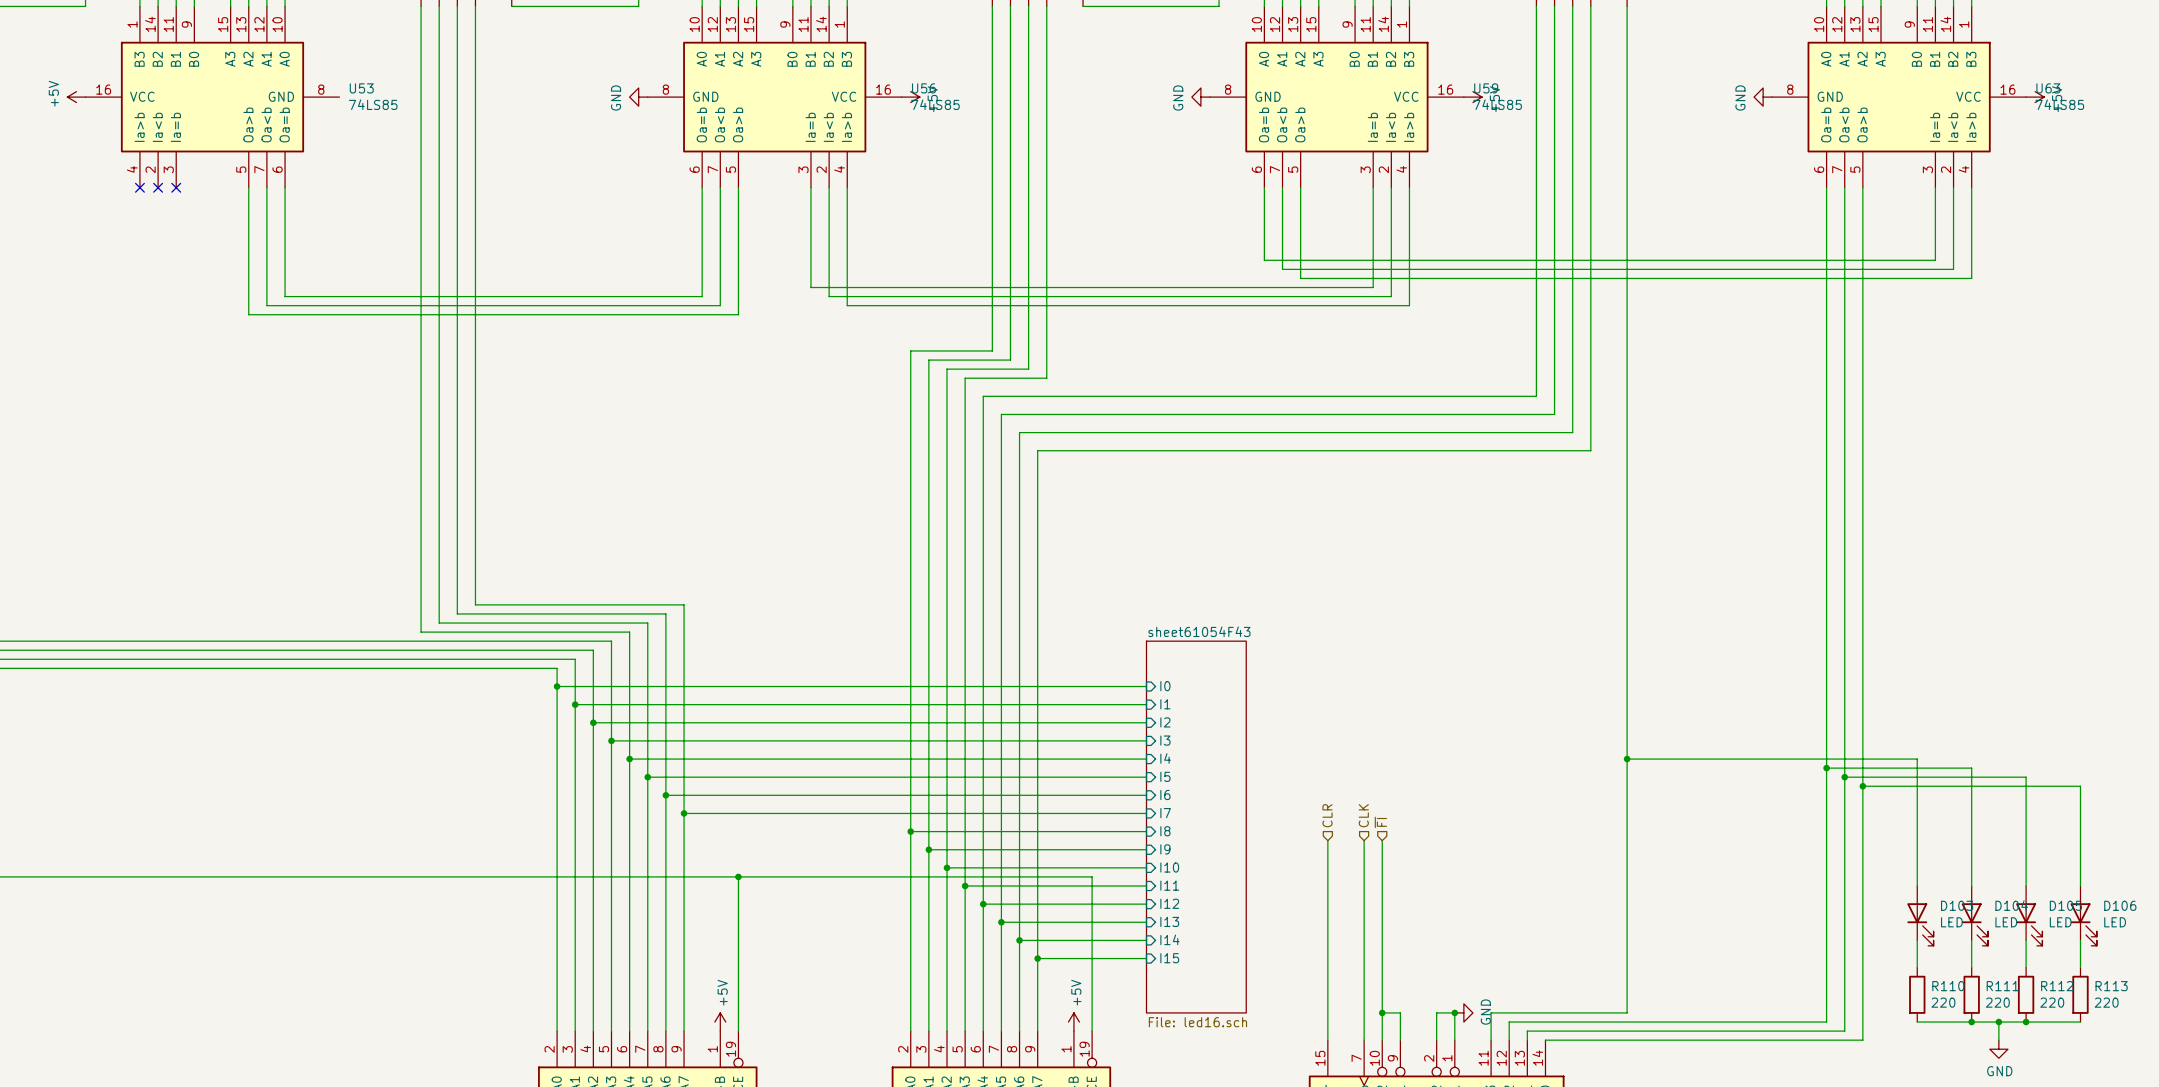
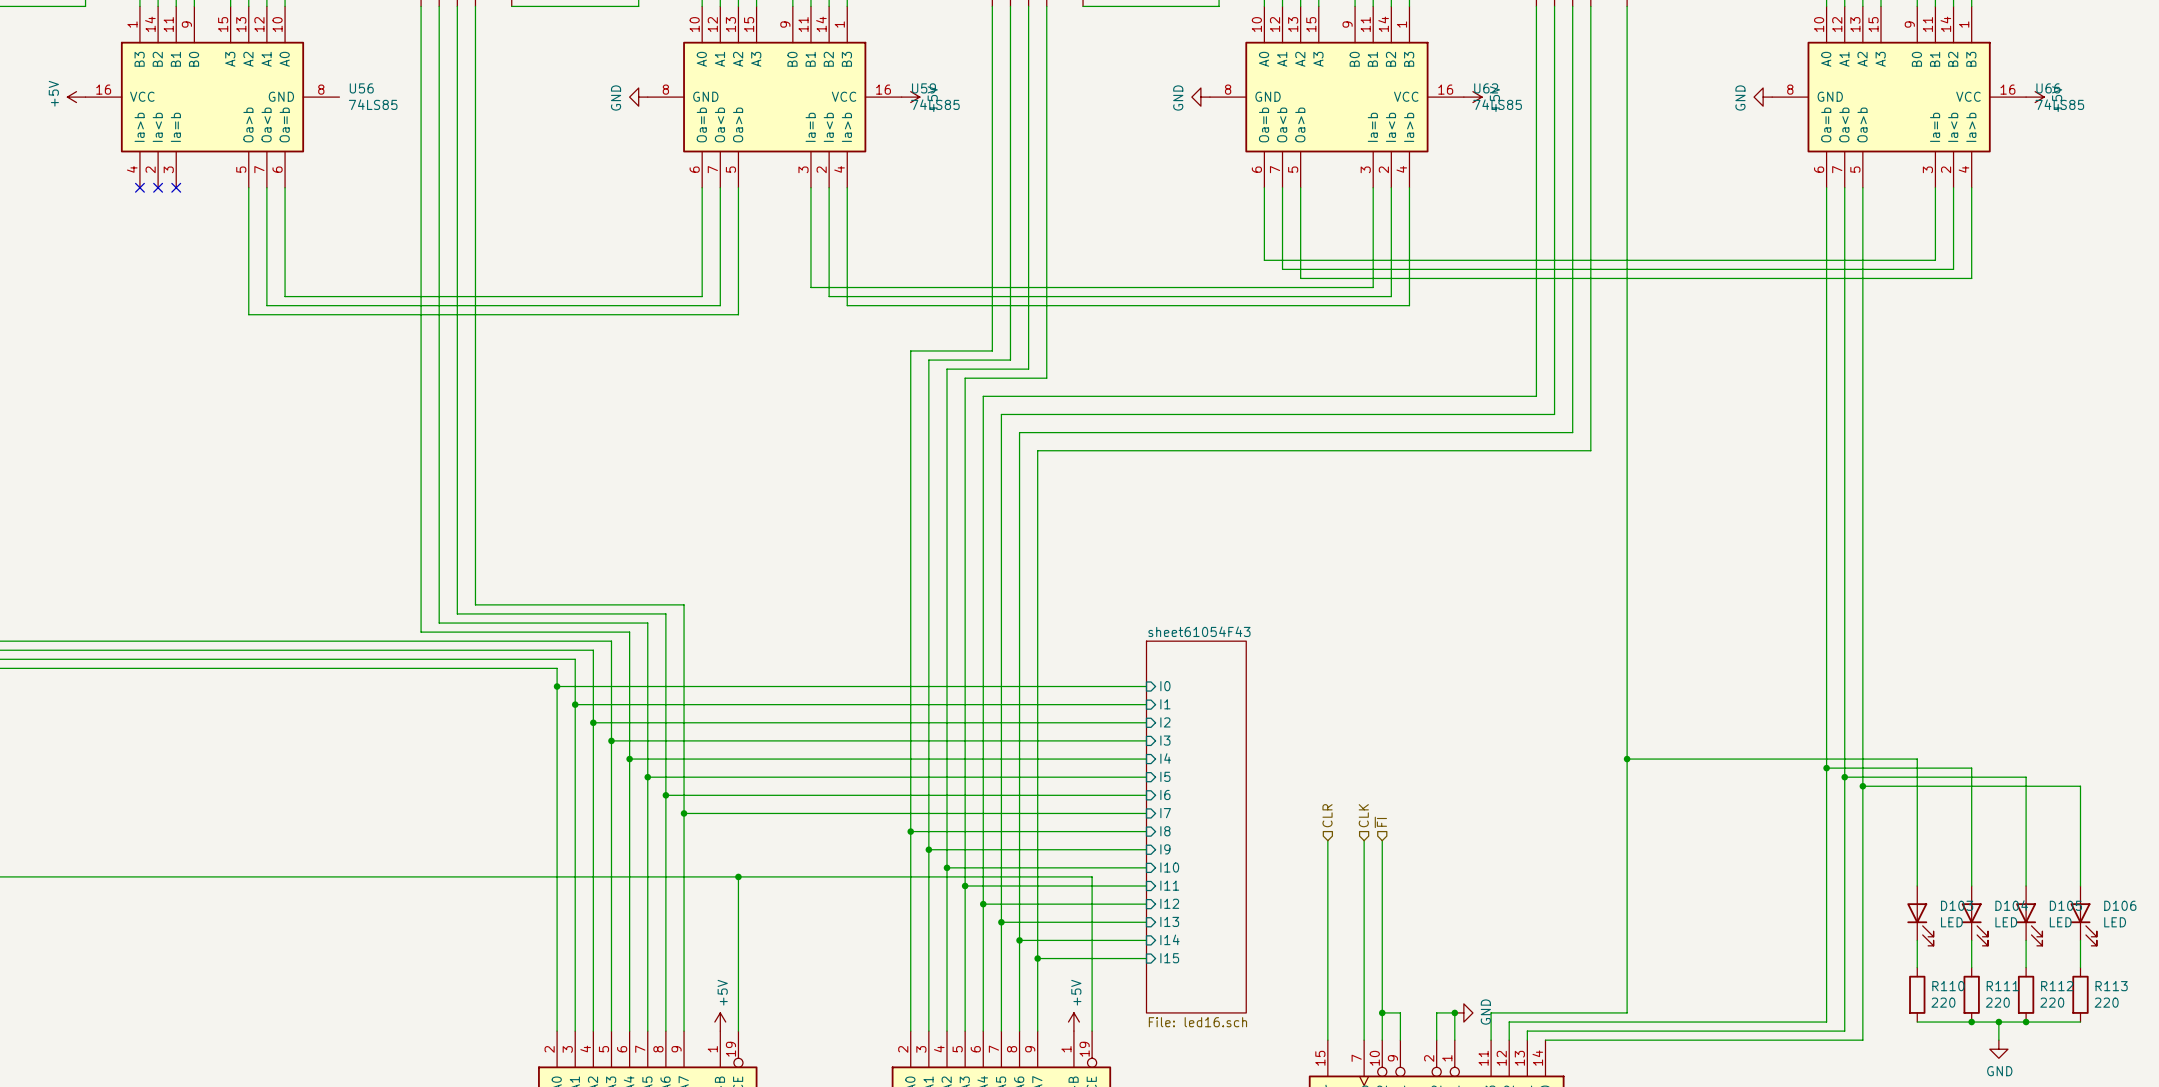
U53 name: U53 (361, 88) -> U56 (361, 88)
U56 name: U56 (923, 88) -> U59 (923, 88)
U59 name: U59 (1486, 88) -> U62 (1486, 88)
U63 name: U63 (2048, 88) -> U66 (2048, 88)

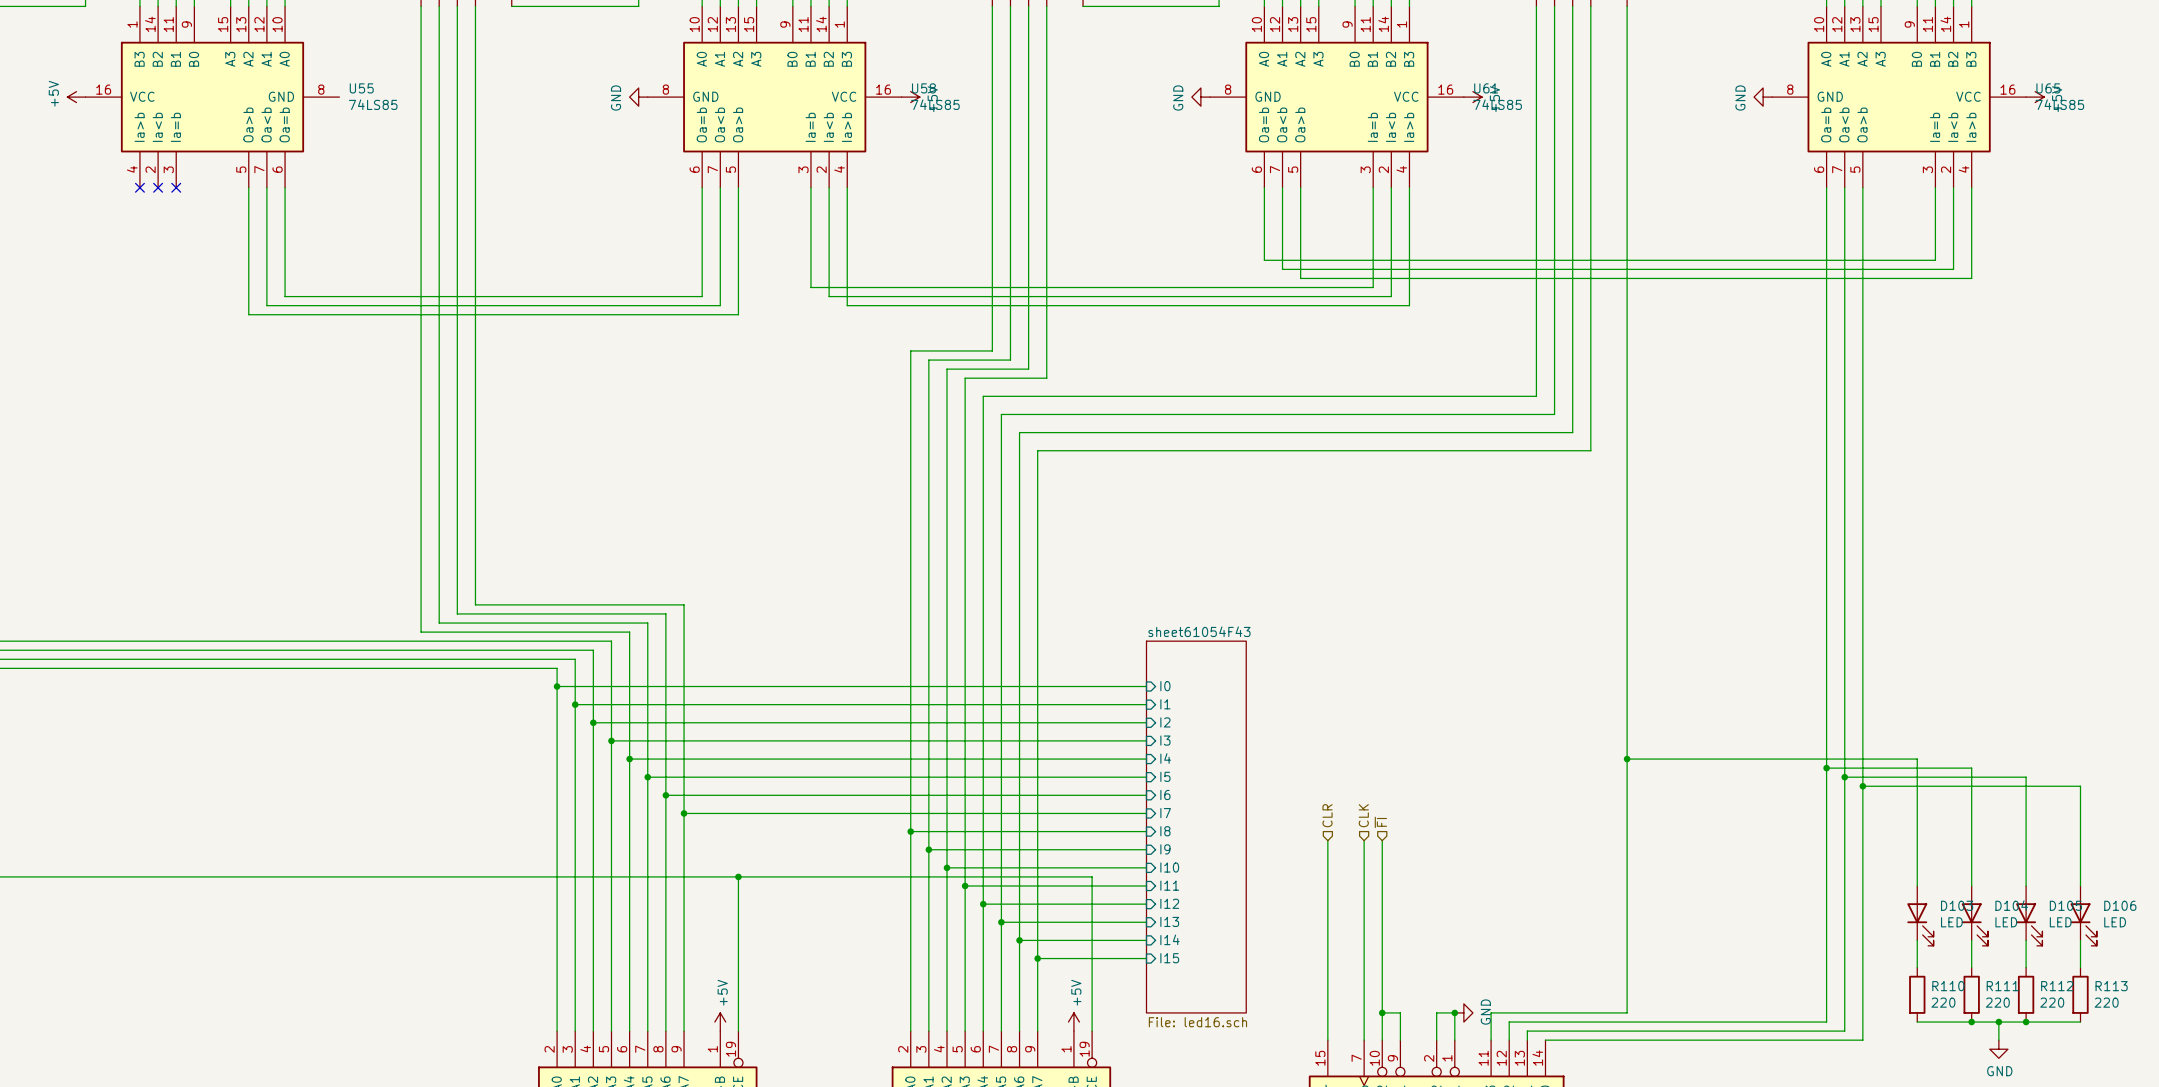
U56 name: U56 (361, 88) -> U55 (361, 88)
U59 name: U59 (923, 88) -> U58 (923, 88)
U62 name: U62 (1486, 88) -> U61 (1486, 88)
U66 name: U66 (2048, 88) -> U65 (2048, 88)

